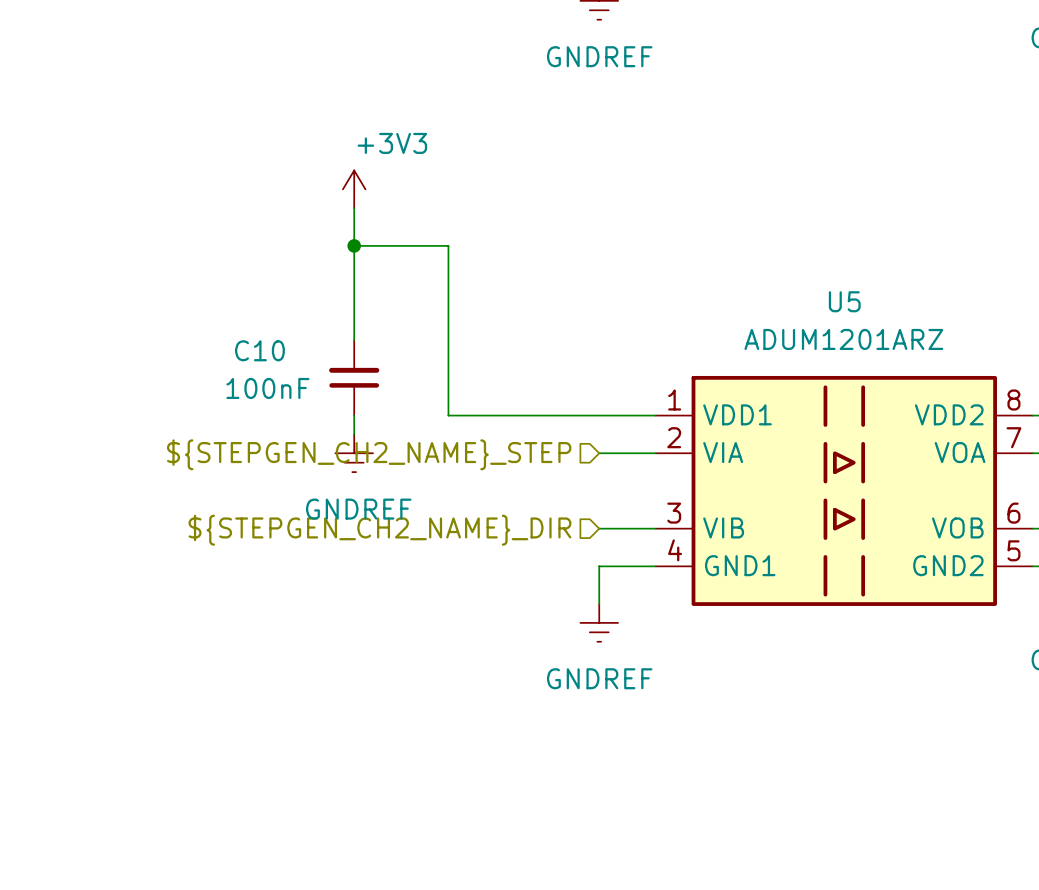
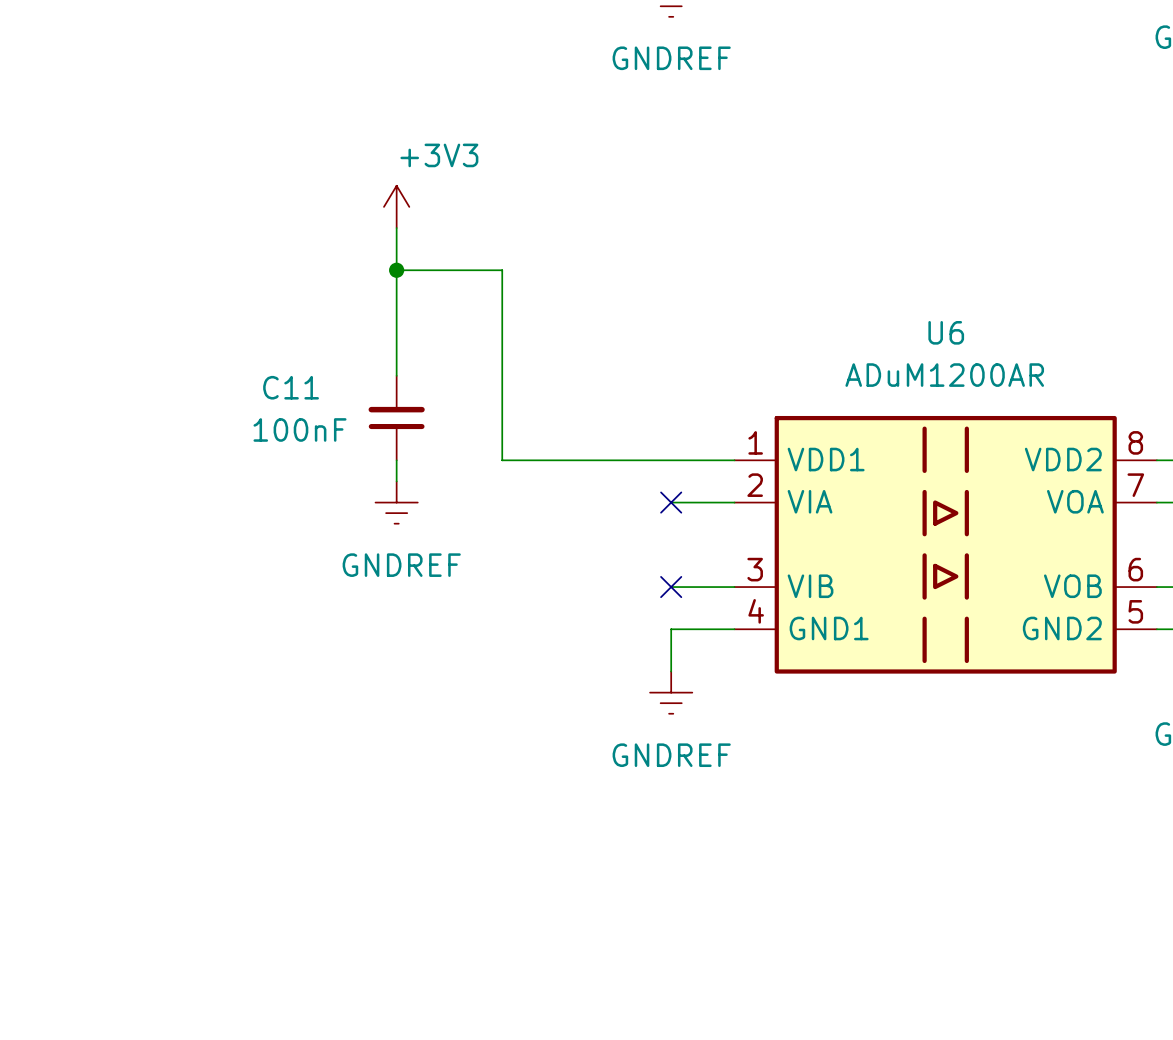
U5 name: U5 (844, 301) -> U6 (946, 332)
U5 value: ADUM1201ARZ (843, 339) -> ADuM1200AR (944, 375)
C10 name: C10 (259, 350) -> C11 (291, 387)
no-connect mark: none -> (671, 502)
hierarchical label: ${STEPGEN_CH2_NAME}_STEP (369, 454) -> none
no-connect mark: none -> (671, 587)
hierarchical label: ${STEPGEN_CH2_NAME}_DIR (379, 530) -> none

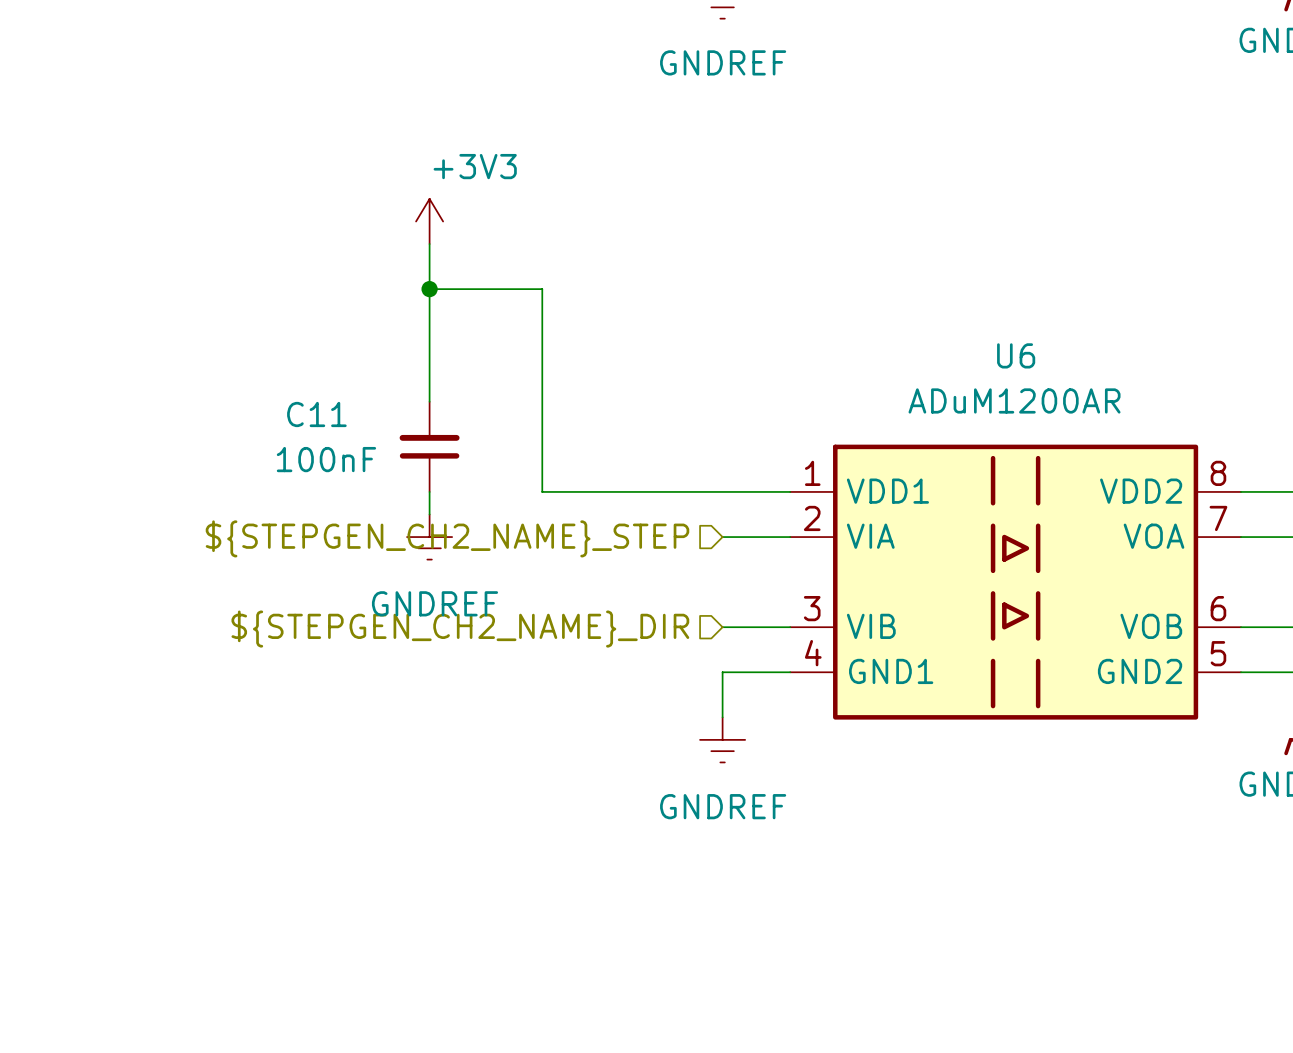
no-connect mark: (671, 502) -> none
hierarchical label: none -> ${STEPGEN_CH2_NAME}_STEP (447, 538)
no-connect mark: (671, 587) -> none
hierarchical label: none -> ${STEPGEN_CH2_NAME}_DIR (460, 629)

